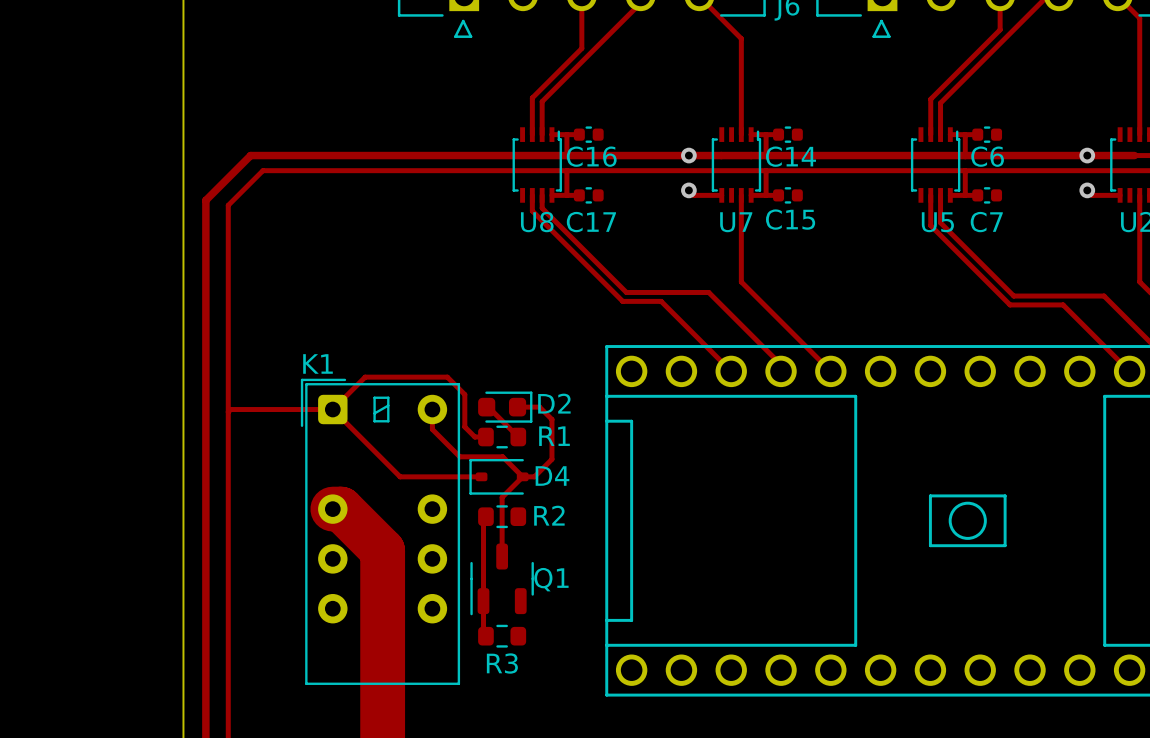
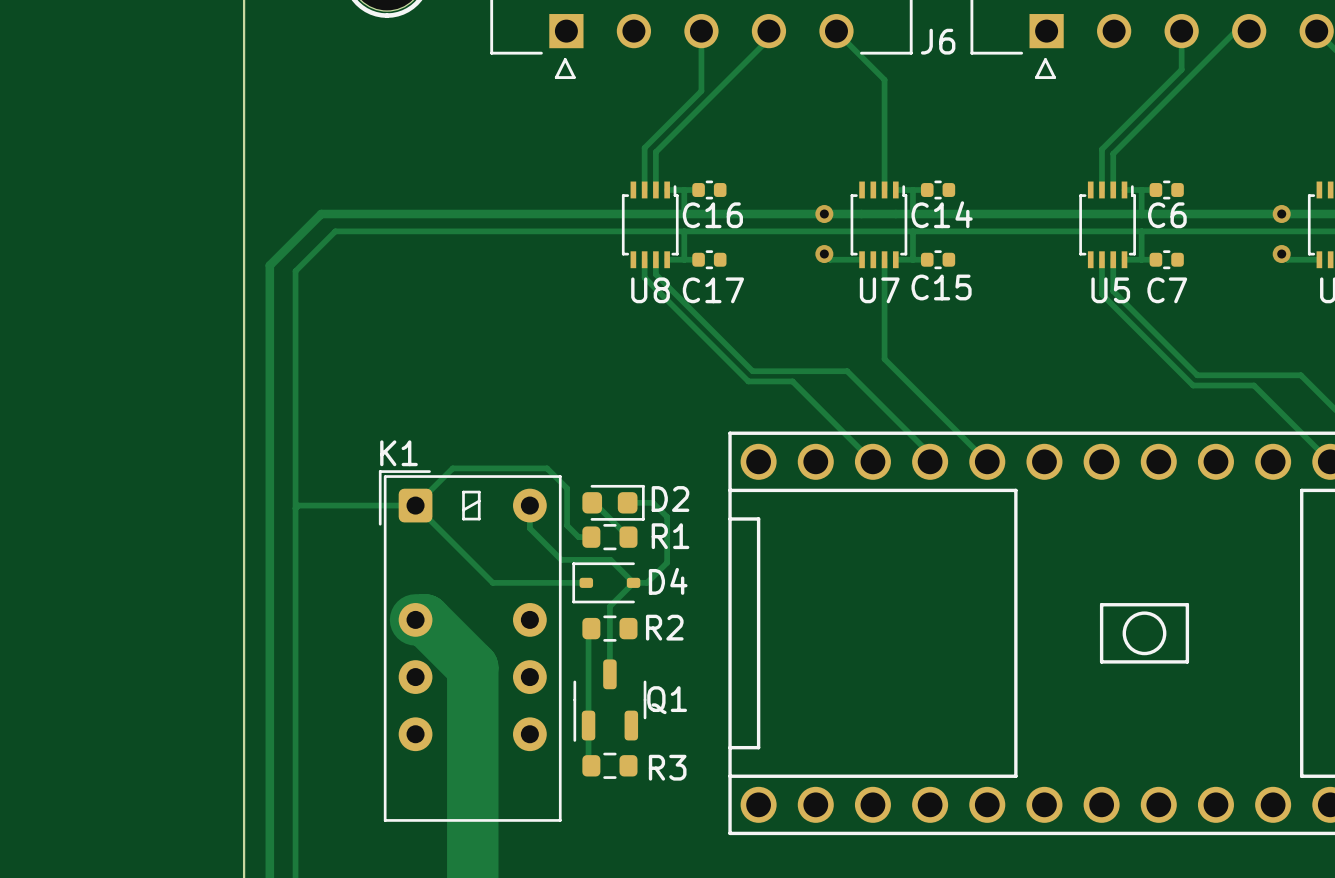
R3 name position: R3 (502, 663) -> R3 (667, 767)

